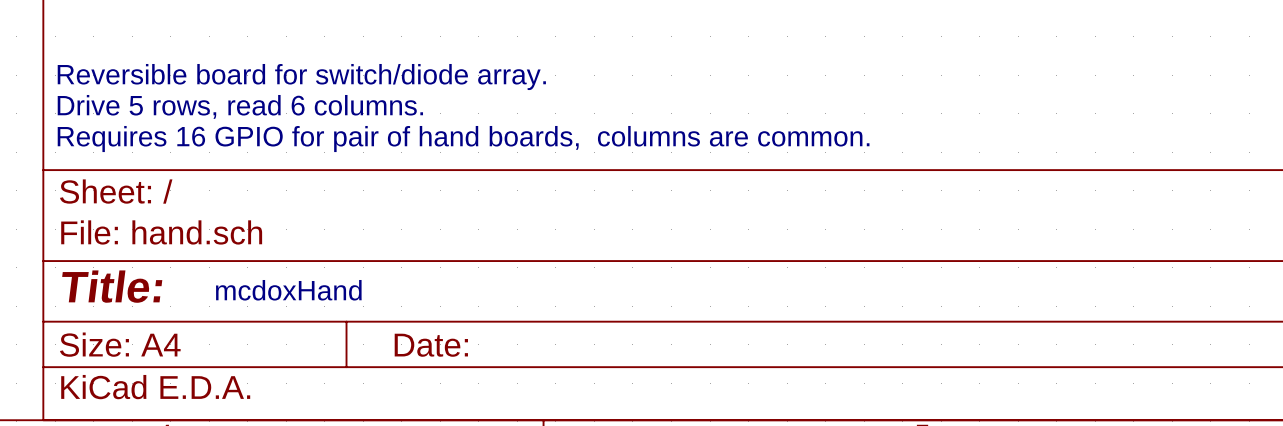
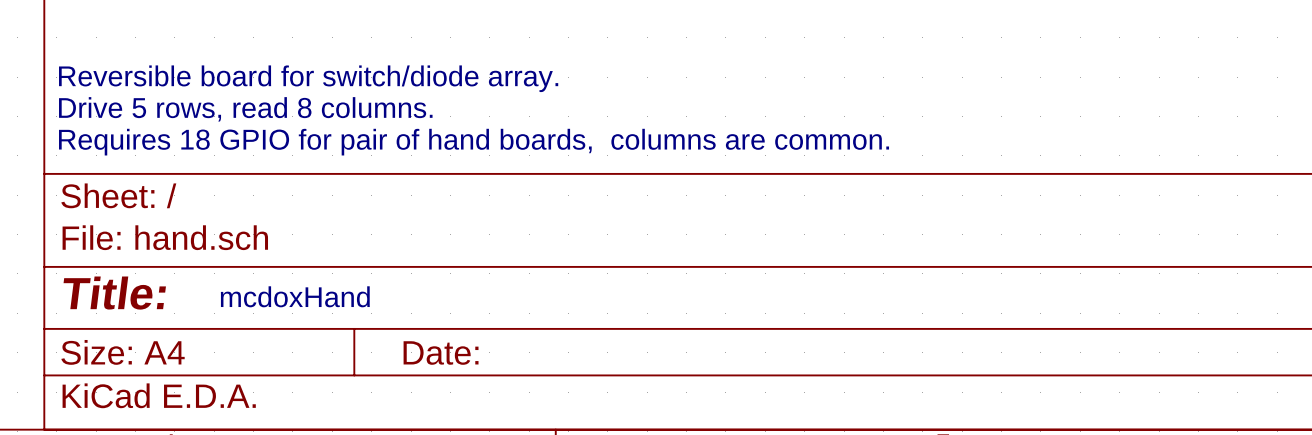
text: Drive 5 rows, read 6 columns. (240, 106) -> Drive 5 rows, read 8 columns. (245, 109)
text: Requires 16 GPIO for pair of hand boards, columns are common. (463, 139) -> Requires 18 GPIO for pair of hand boards, columns are common. (474, 142)

